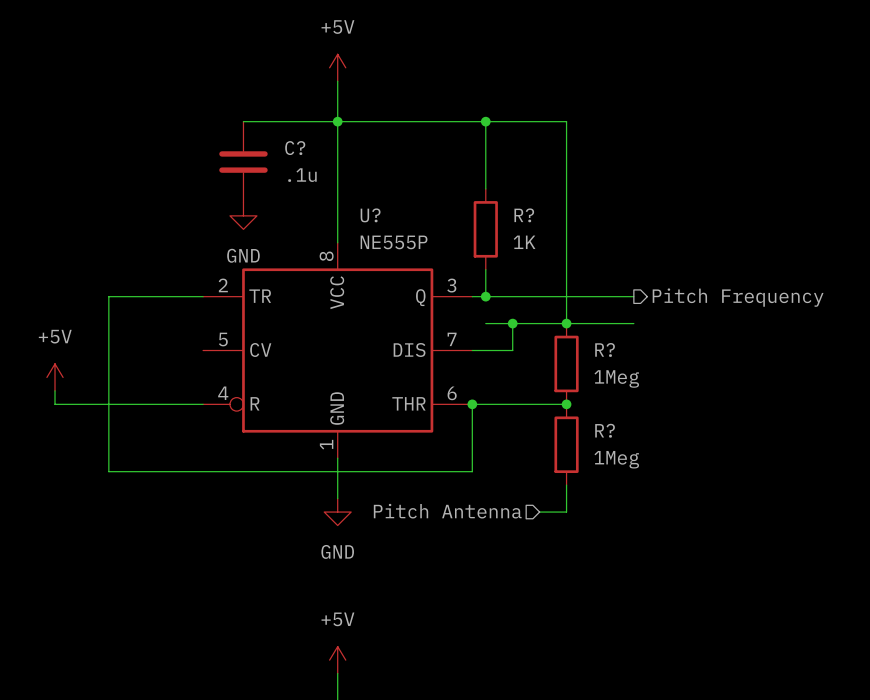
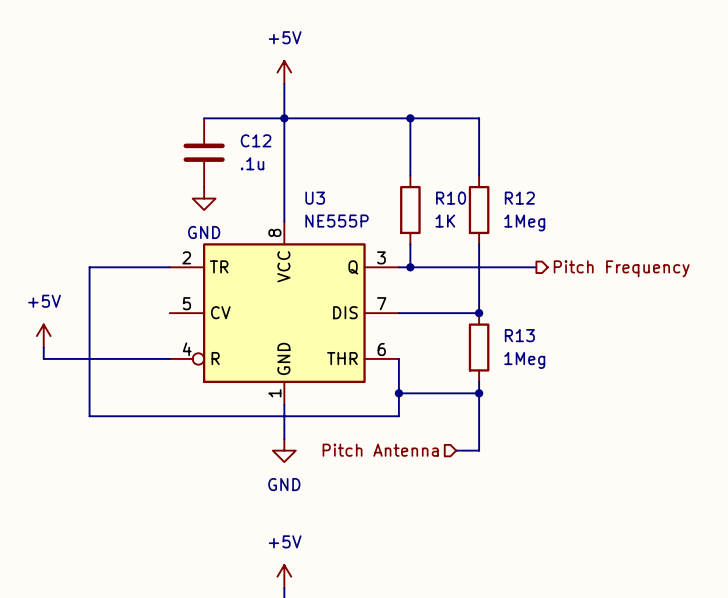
C? name: C? (295, 148) -> C12 (256, 140)
wire: (566, 188) (566, 269) -> none
U? name: U? (370, 215) -> U3 (315, 198)
R? name: R? (524, 215) -> R10 (451, 198)
R12: none -> 1Meg (479, 210)
wire: (485, 323) (633, 323) -> none
wire: (512, 323) (512, 350) -> (479, 290) (479, 313) (433, 313)
junction: (512, 323) -> none
junction: (566, 323) -> none
junction: none -> (479, 313)
R?: 1Meg (566, 363) -> none
R13: none -> 1Meg (479, 347)
wire: (472, 404) (566, 404) -> (398, 393) (479, 393)
junction position: (472, 404) -> (398, 393)
junction: (566, 404) -> none
wire: none -> (479, 381) (479, 427)
junction: none -> (479, 393)
R?: 1Meg (566, 444) -> none

